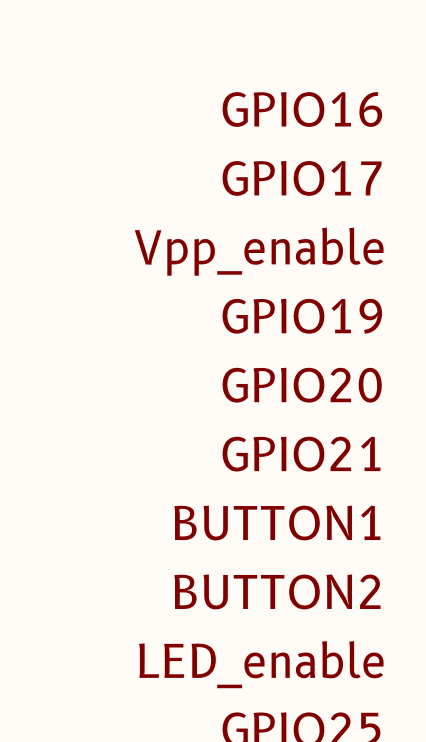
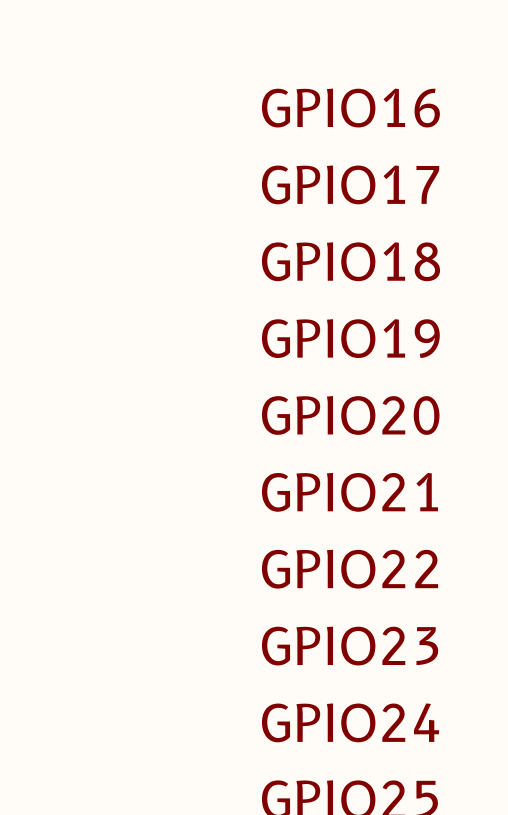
label: Vpp_enable (259, 251) -> GPIO18 (350, 261)
label: BUTTON1 (277, 523) -> GPIO22 (350, 569)
label: BUTTON2 (277, 591) -> GPIO23 (350, 646)
label: LED_enable (261, 664) -> GPIO24 (350, 722)

